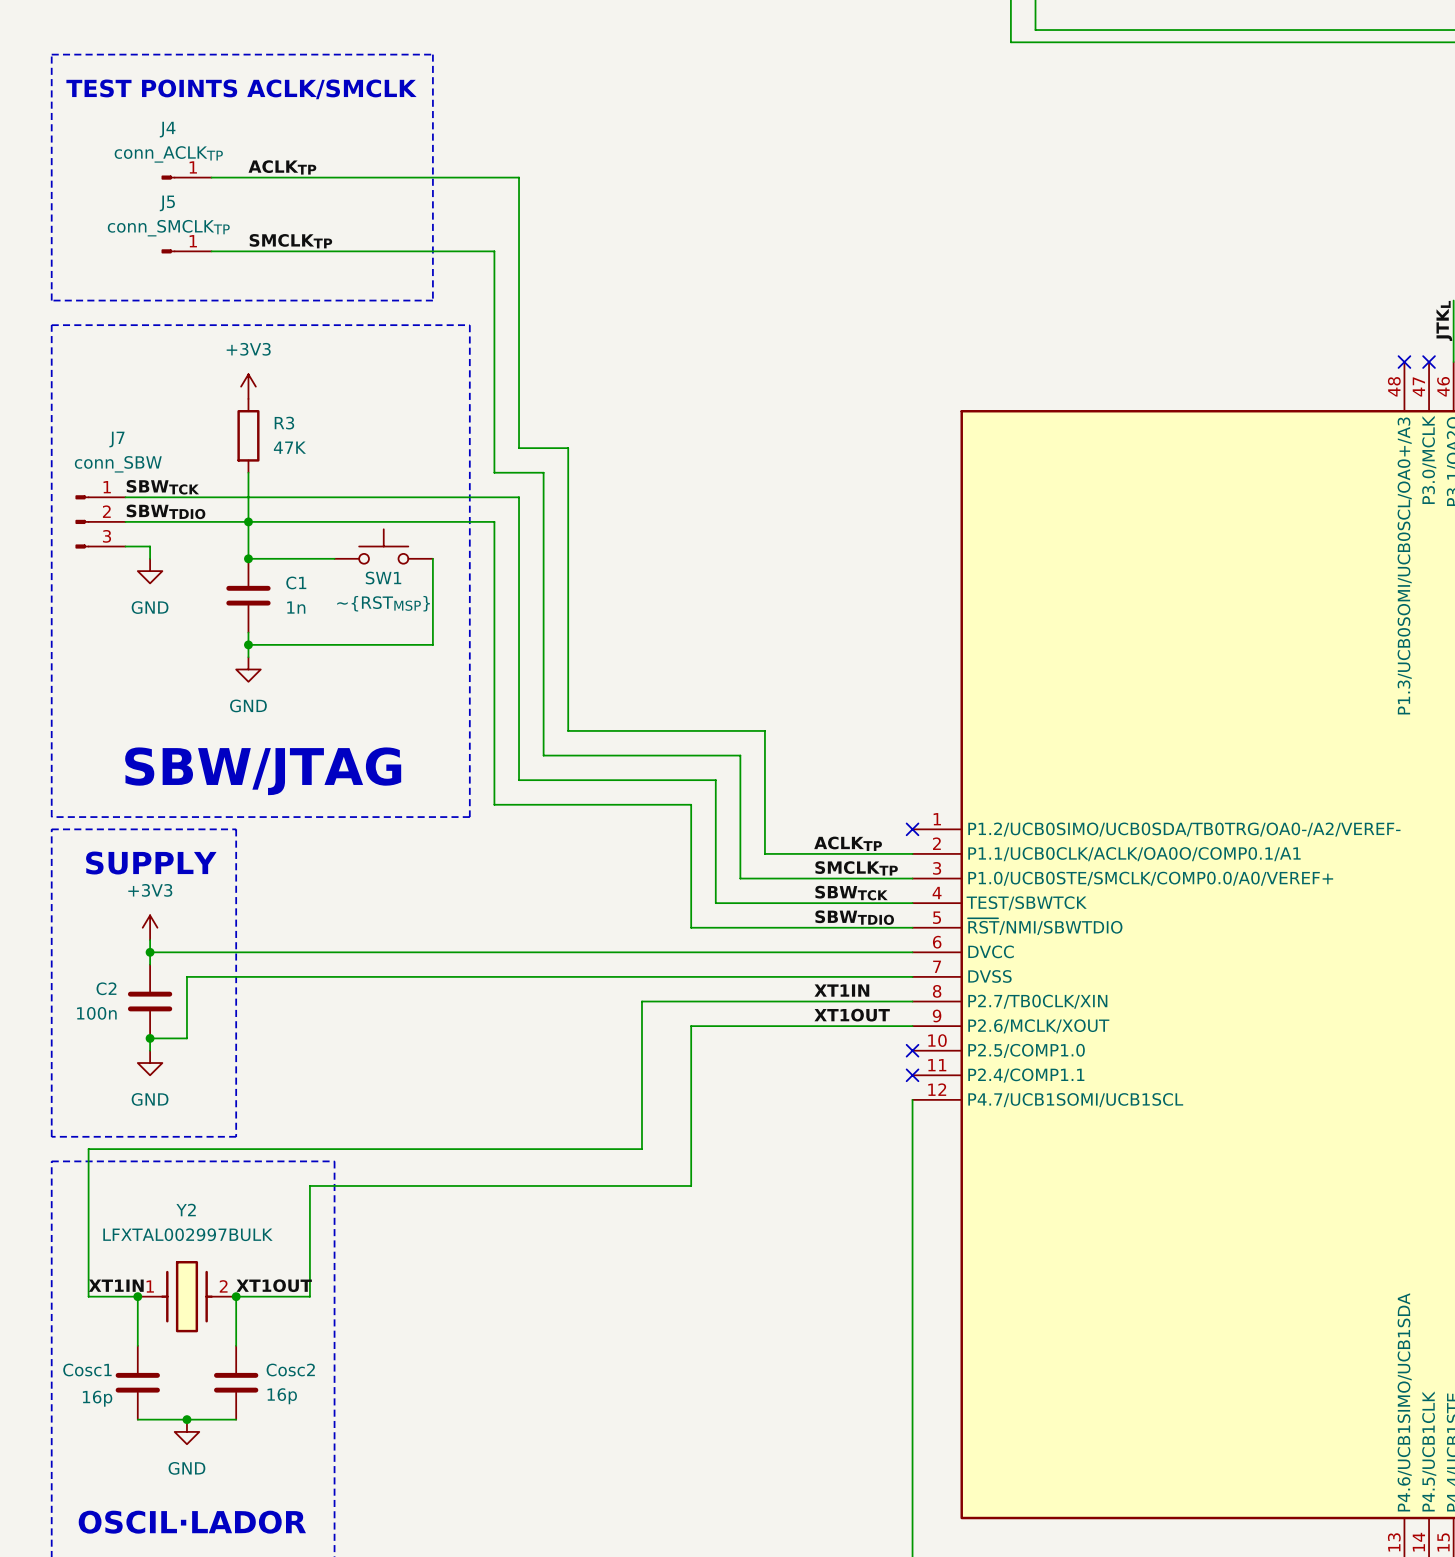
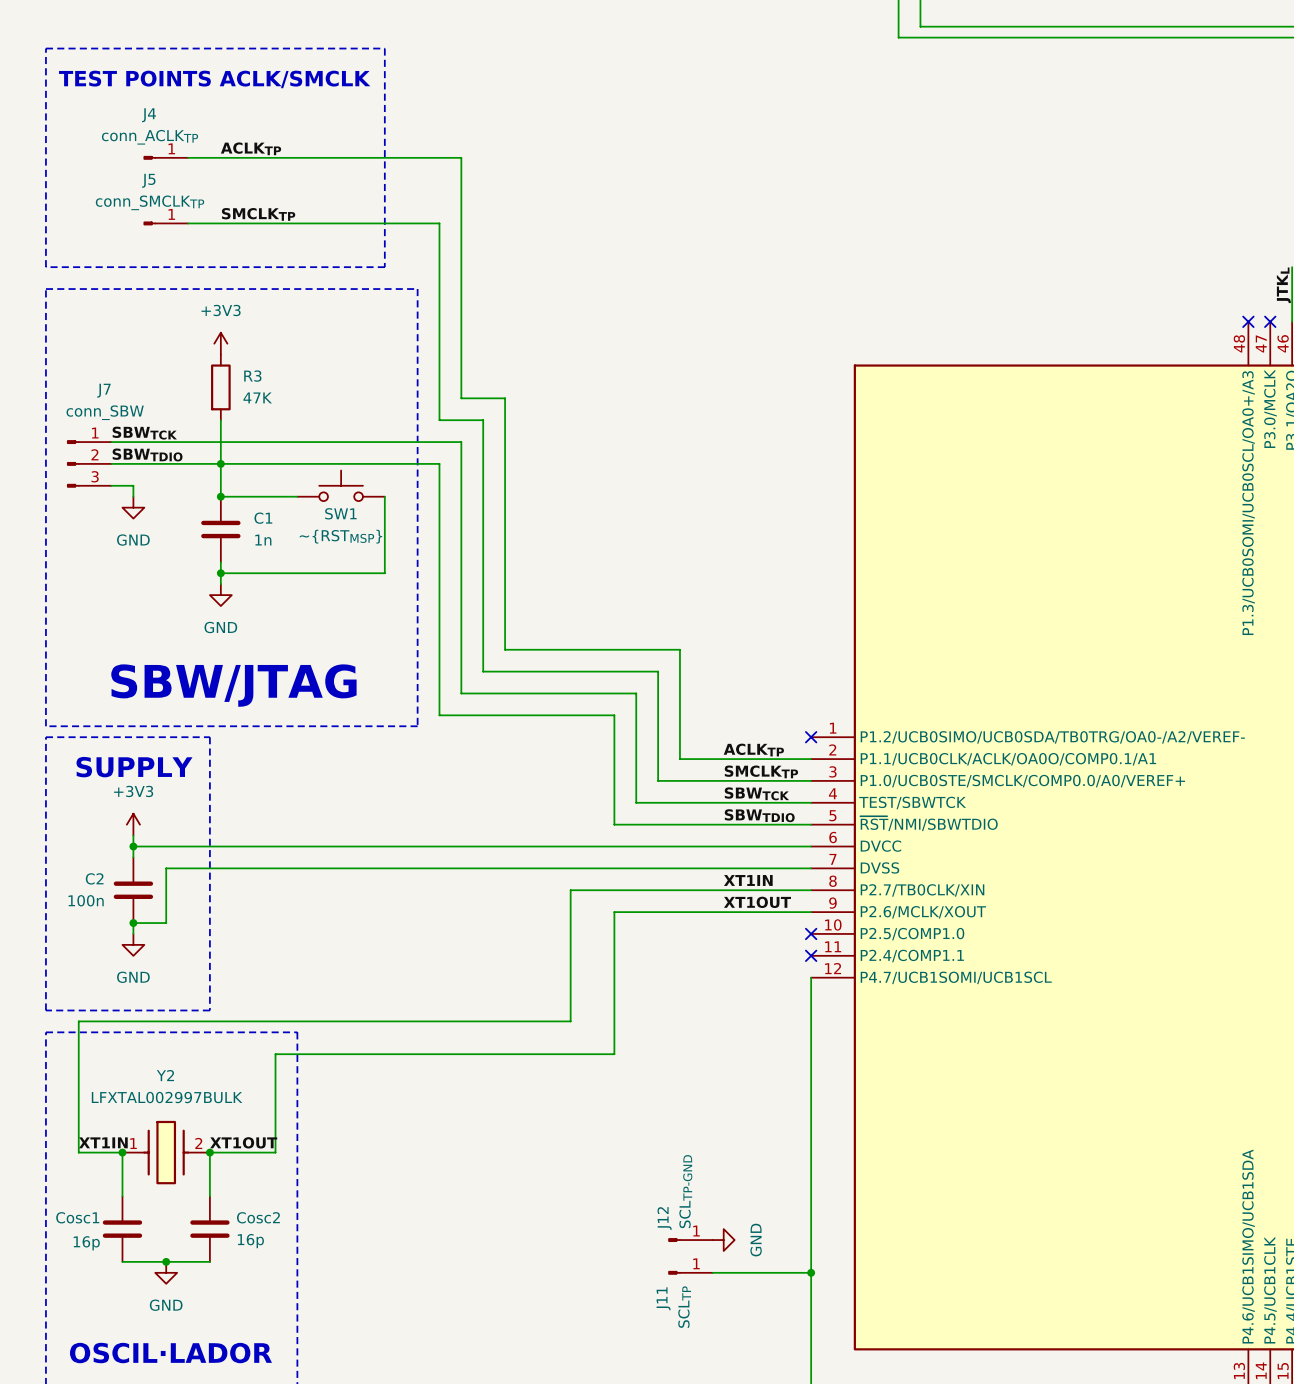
J12: none -> SCLTP-GND (690, 1240)
power symbol: none -> GND (723, 1240)
J11: none -> SCLTP (690, 1272)
wire: none -> (712, 1272) (811, 1272)
junction: none -> (811, 1272)

